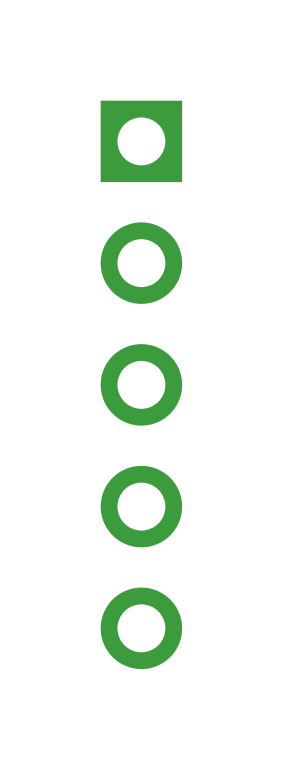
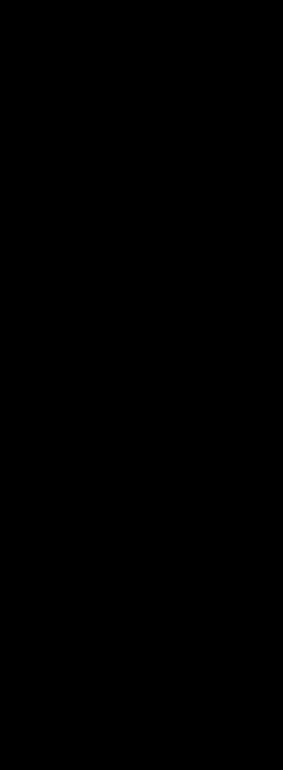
part: (141, 384) -> none

